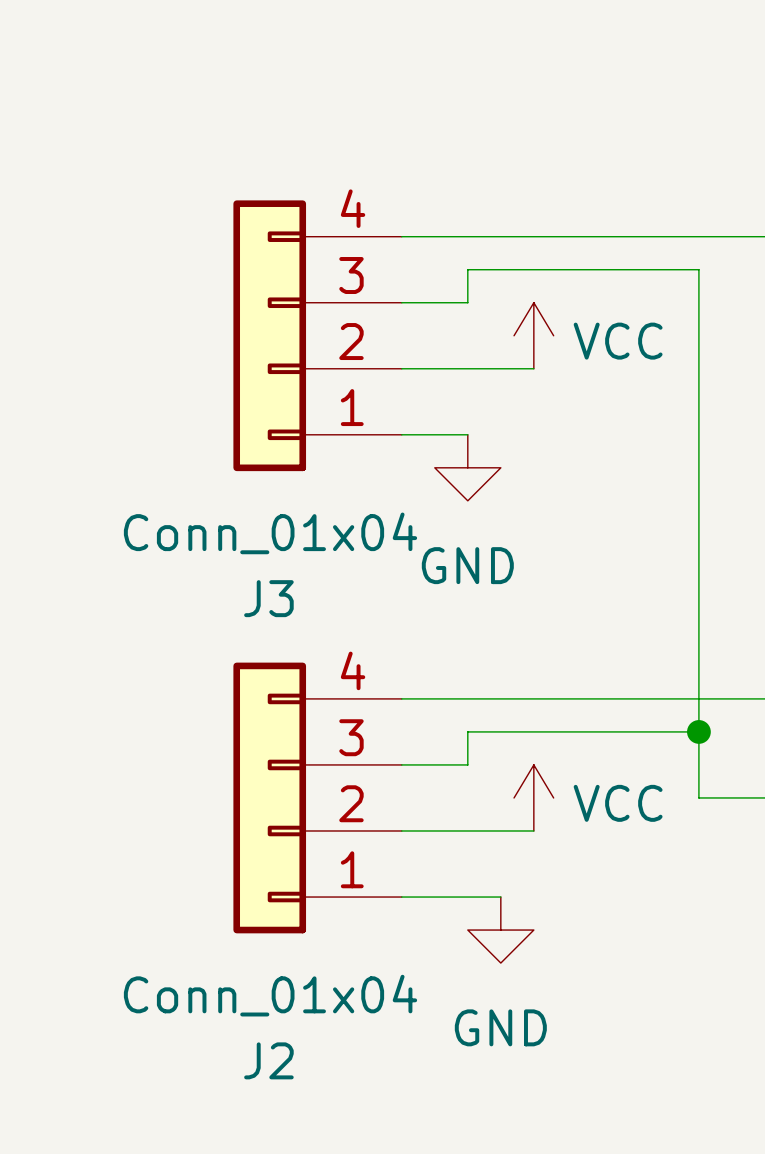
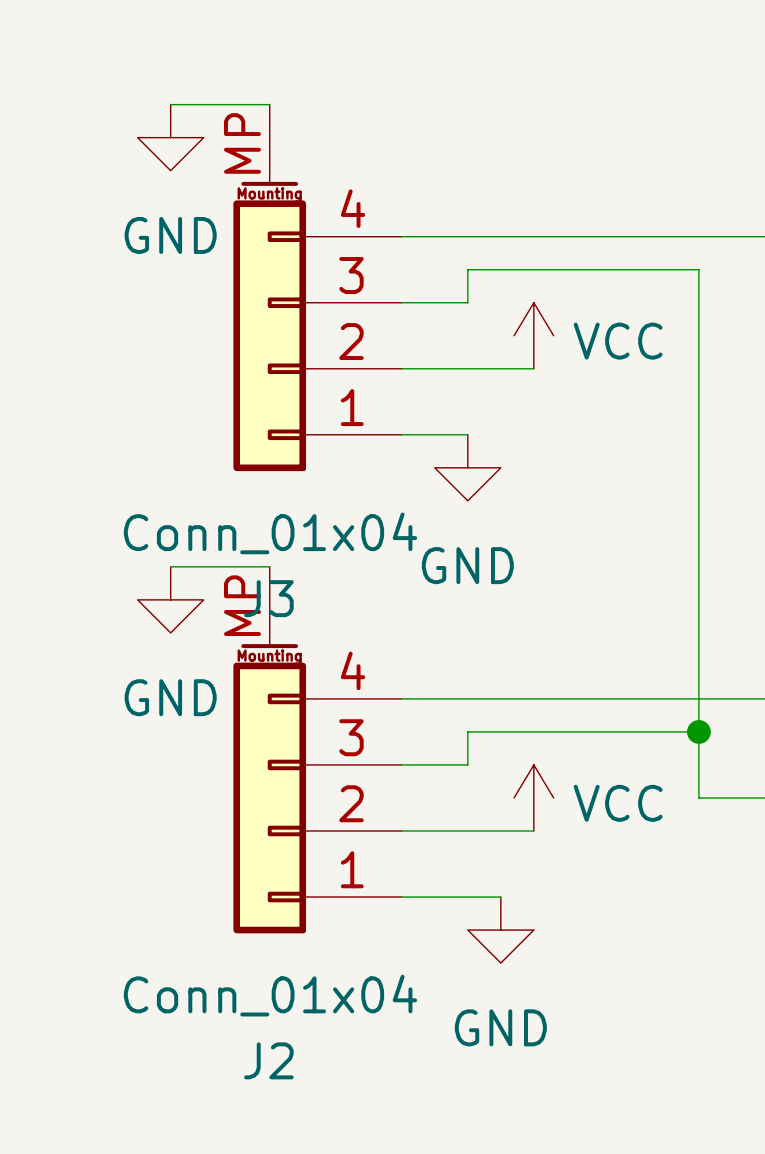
wire: none -> (170, 104) (269, 104)
power symbol: none -> GND (170, 137)
J3 symbol: [233, 200, 402, 472] -> [233, 104, 402, 472]
wire: none -> (170, 566) (269, 566)
power symbol: none -> GND (170, 599)
J2 symbol: [233, 662, 402, 934] -> [233, 566, 402, 934]

